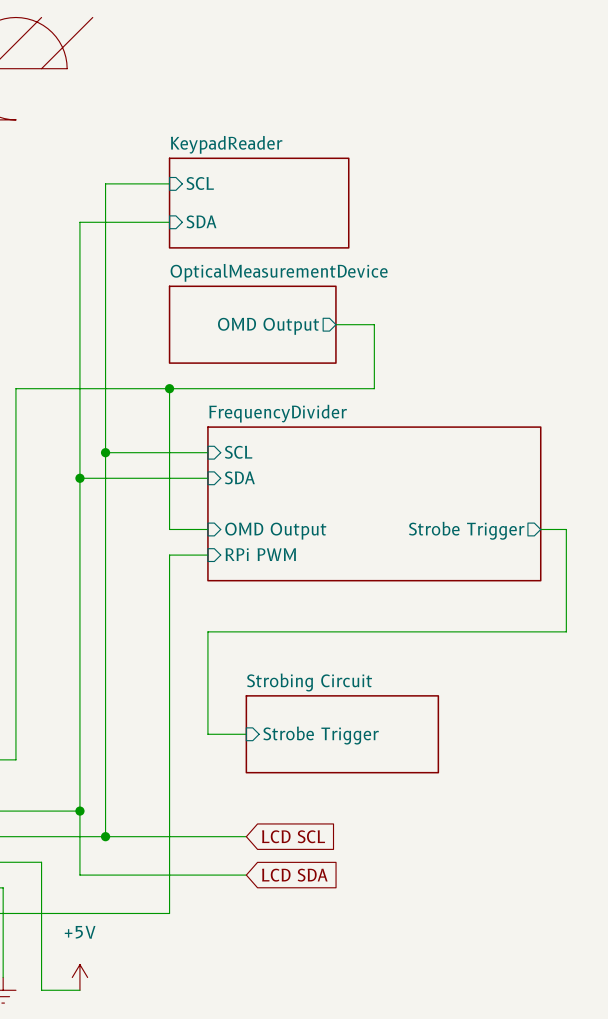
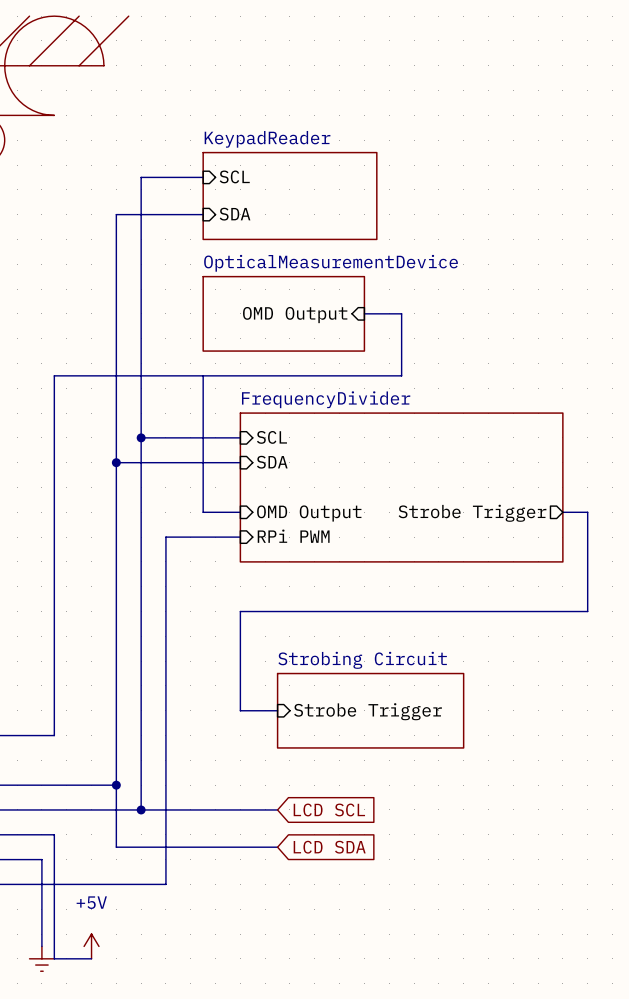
sheet pin shape: output (268, 326) -> input (295, 315)
junction: (169, 388) -> none
wire: (169, 555) (169, 913) (131, 913) -> (203, 537) (165, 537) (165, 884)
wire: (15, 862) (41, 862) (41, 990) -> (54, 834) (54, 958) (79, 958)
power symbol position: +5V (79, 977) -> +5V (91, 946)
wire: (54, 990) (79, 990) -> none

